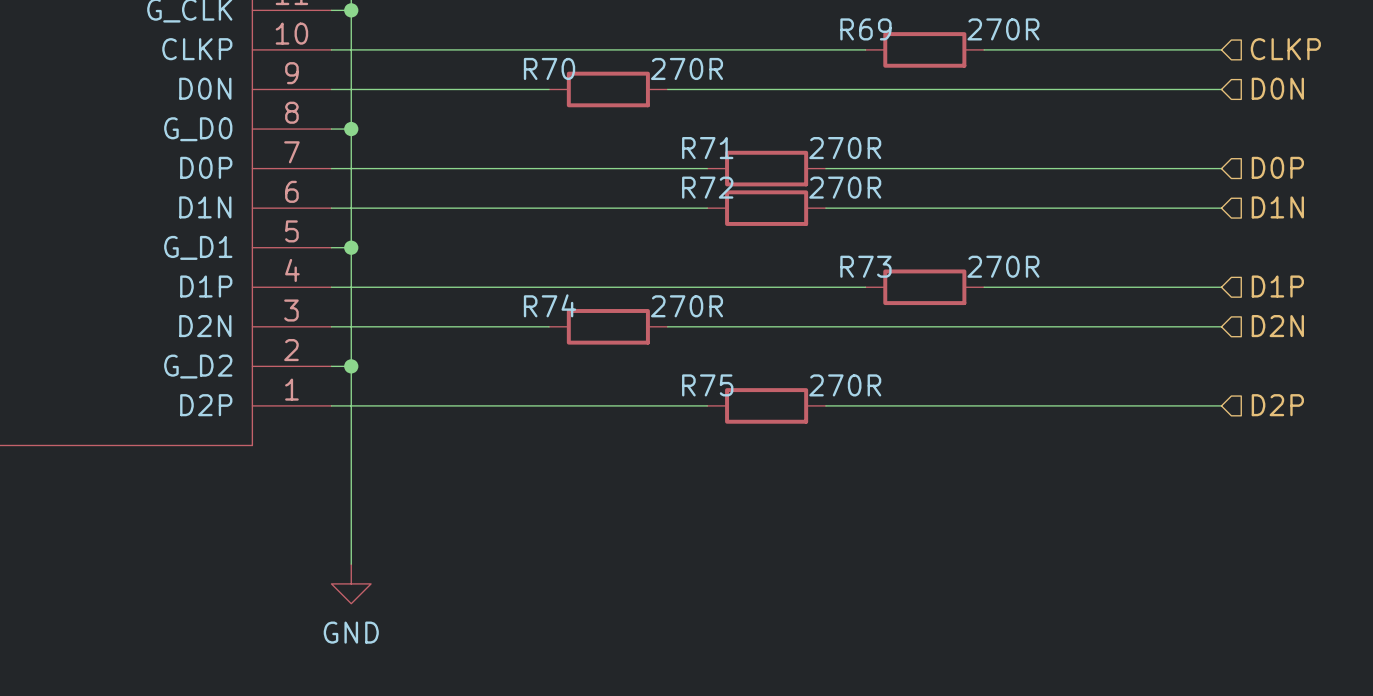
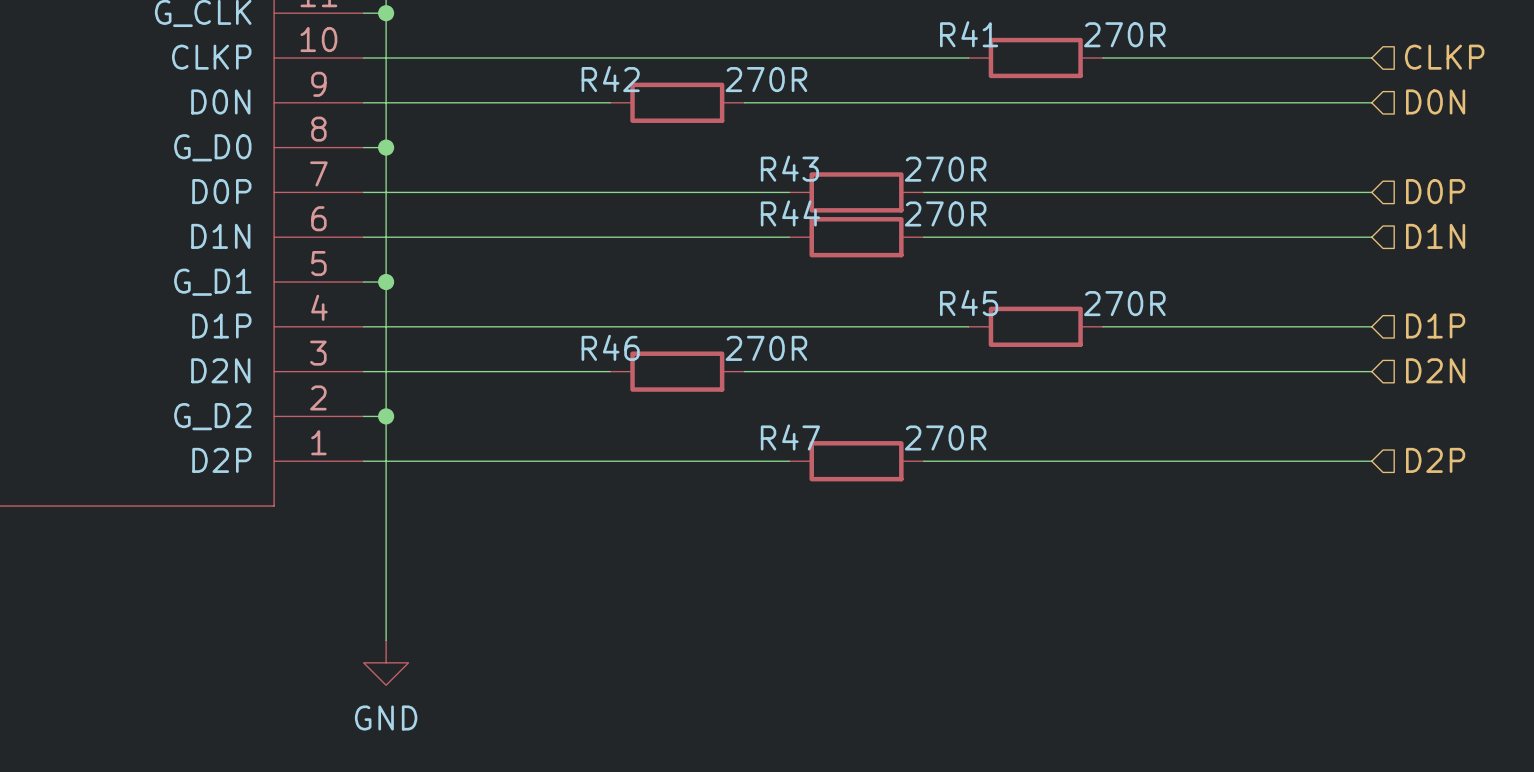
R69 name: R69 (865, 29) -> R41 (969, 34)
R70 name: R70 (549, 68) -> R42 (610, 79)
R71 name: R71 (707, 148) -> R43 (789, 168)
R72 name: R72 (707, 187) -> R44 (790, 213)
R73 name: R73 (865, 266) -> R45 (969, 303)
R74 name: R74 (549, 305) -> R46 (610, 347)
R75 name: R75 (707, 385) -> R47 (790, 437)

